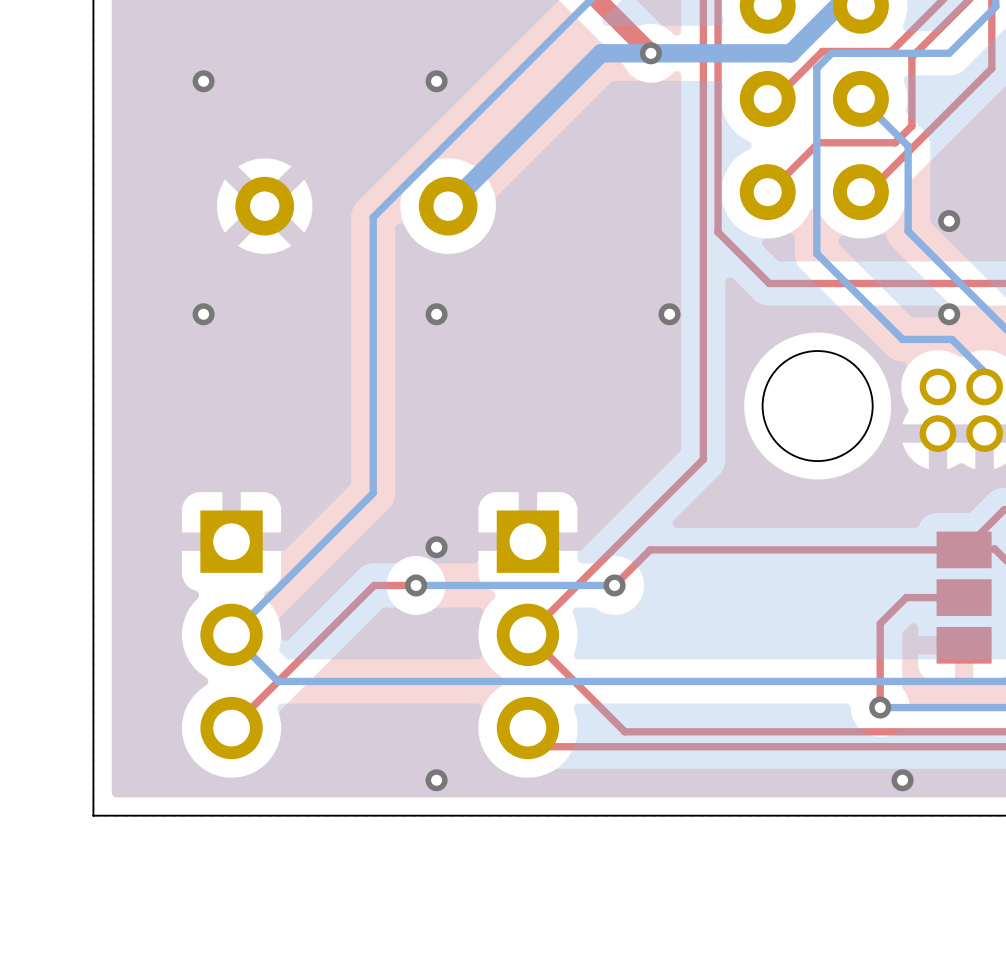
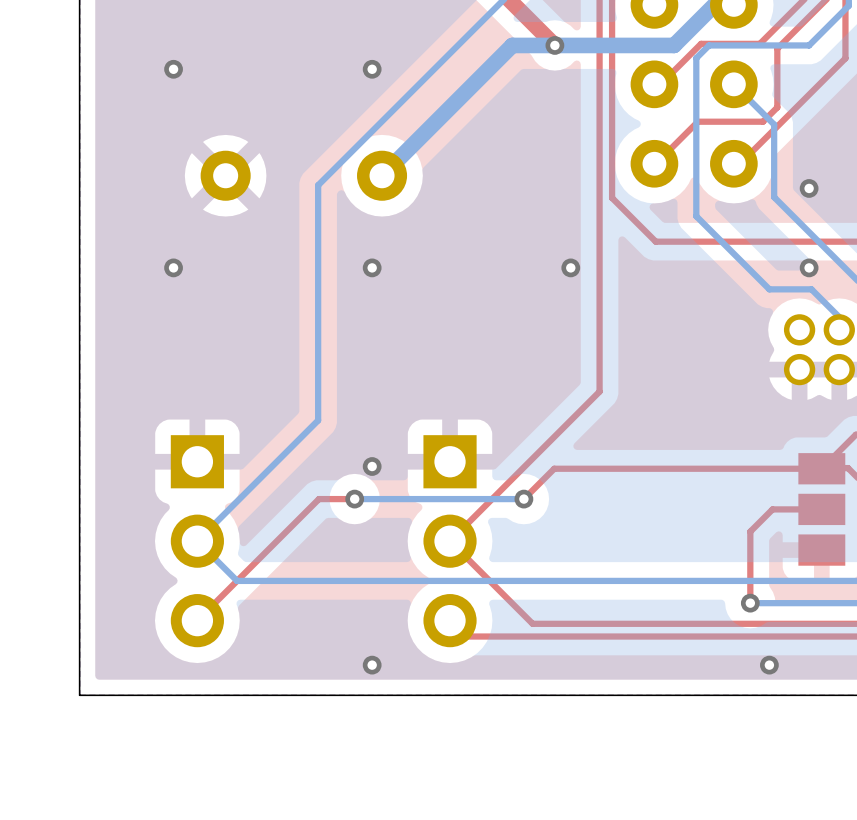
round board edge: [761, 350, 874, 463] -> none

